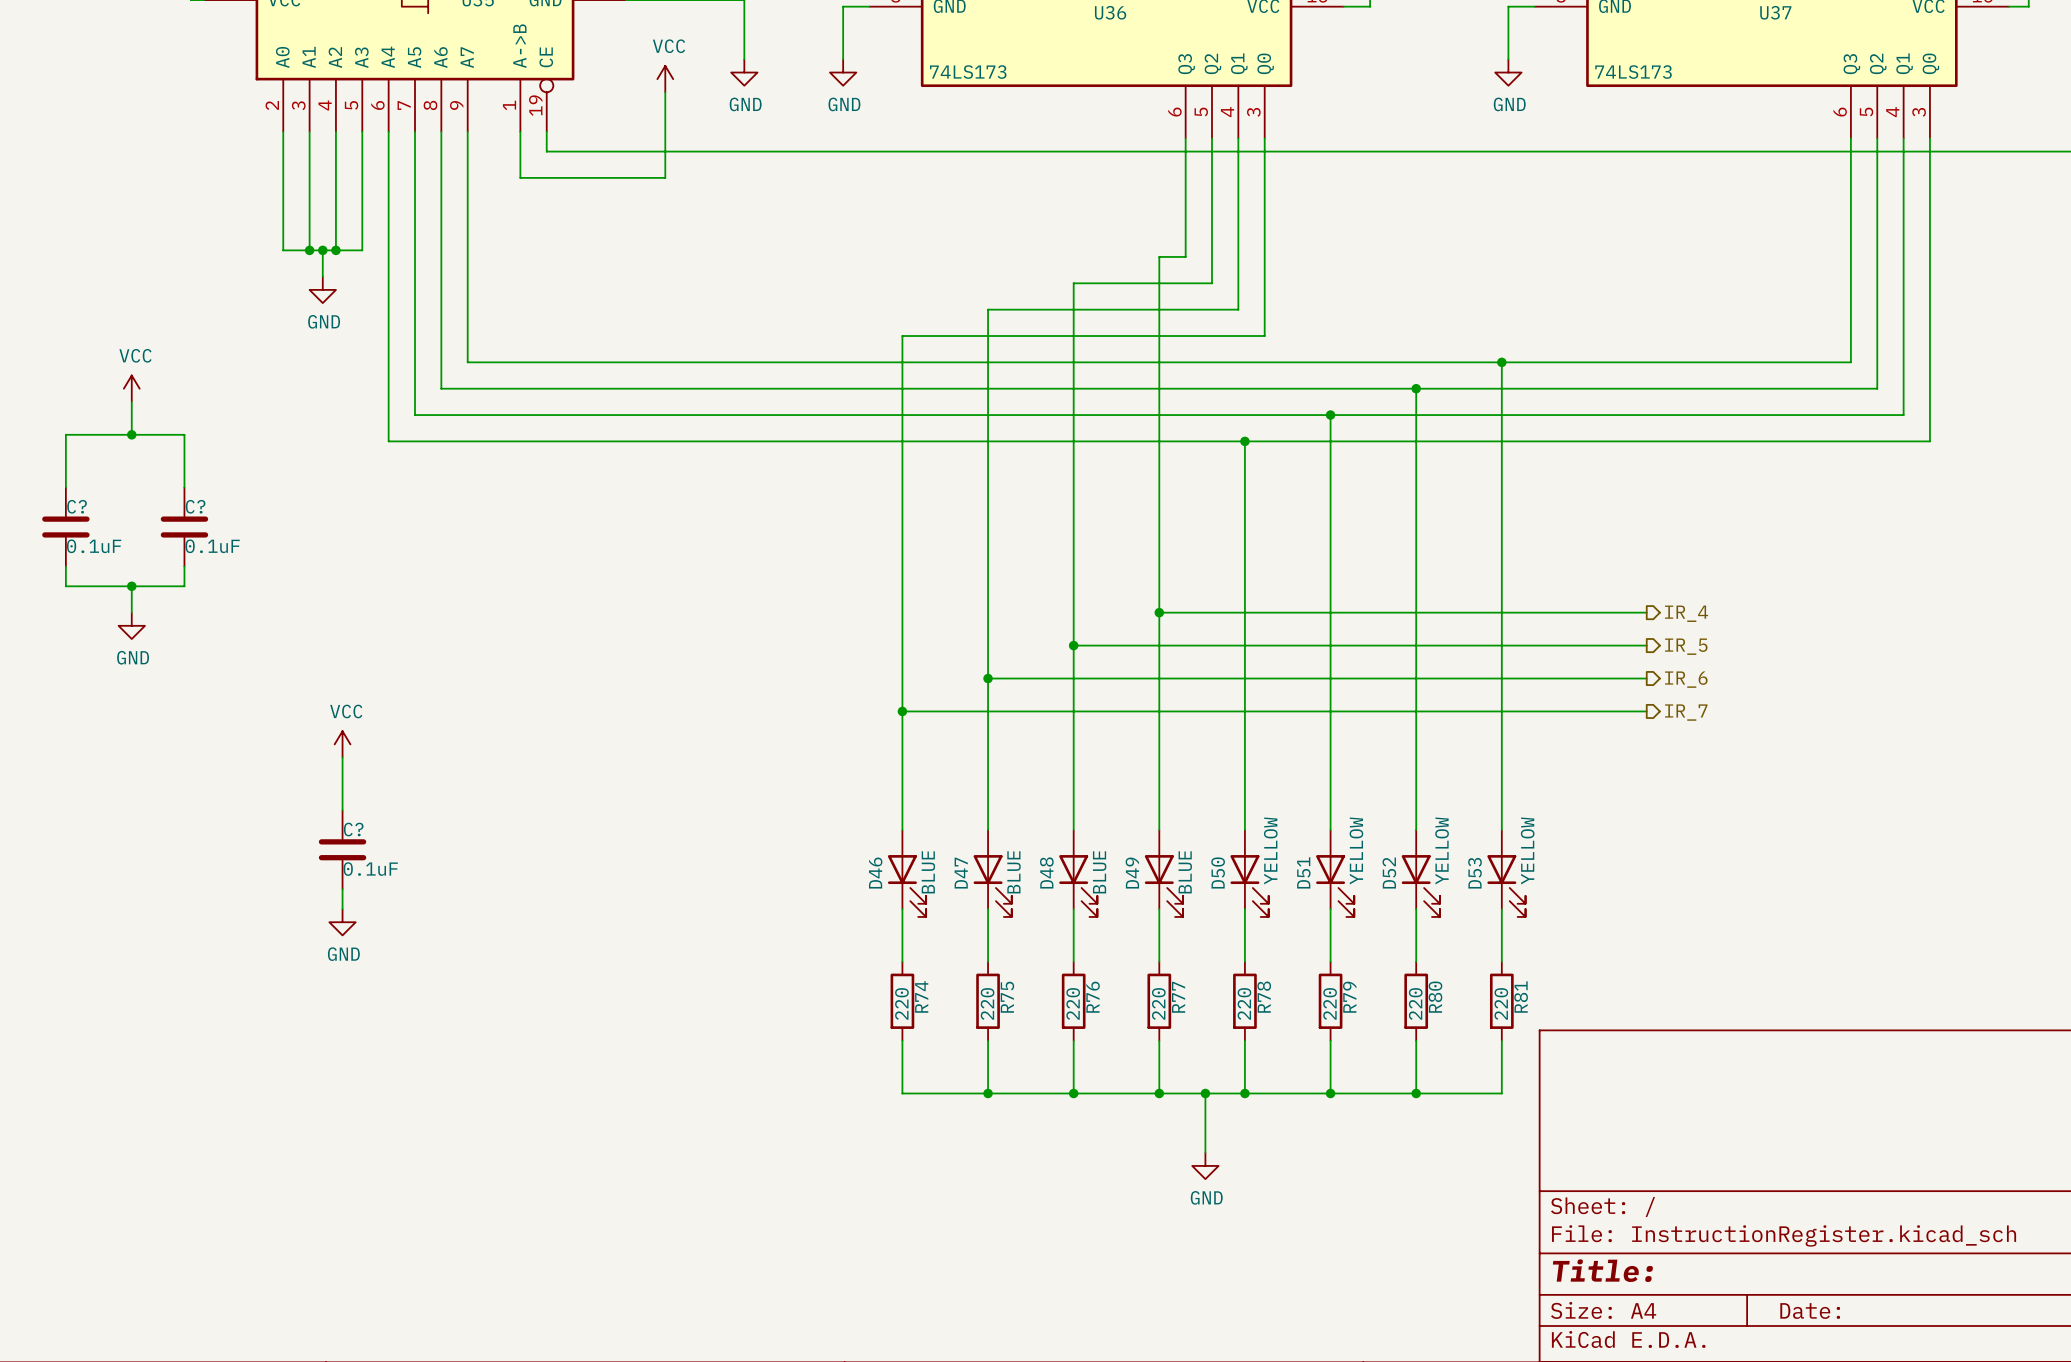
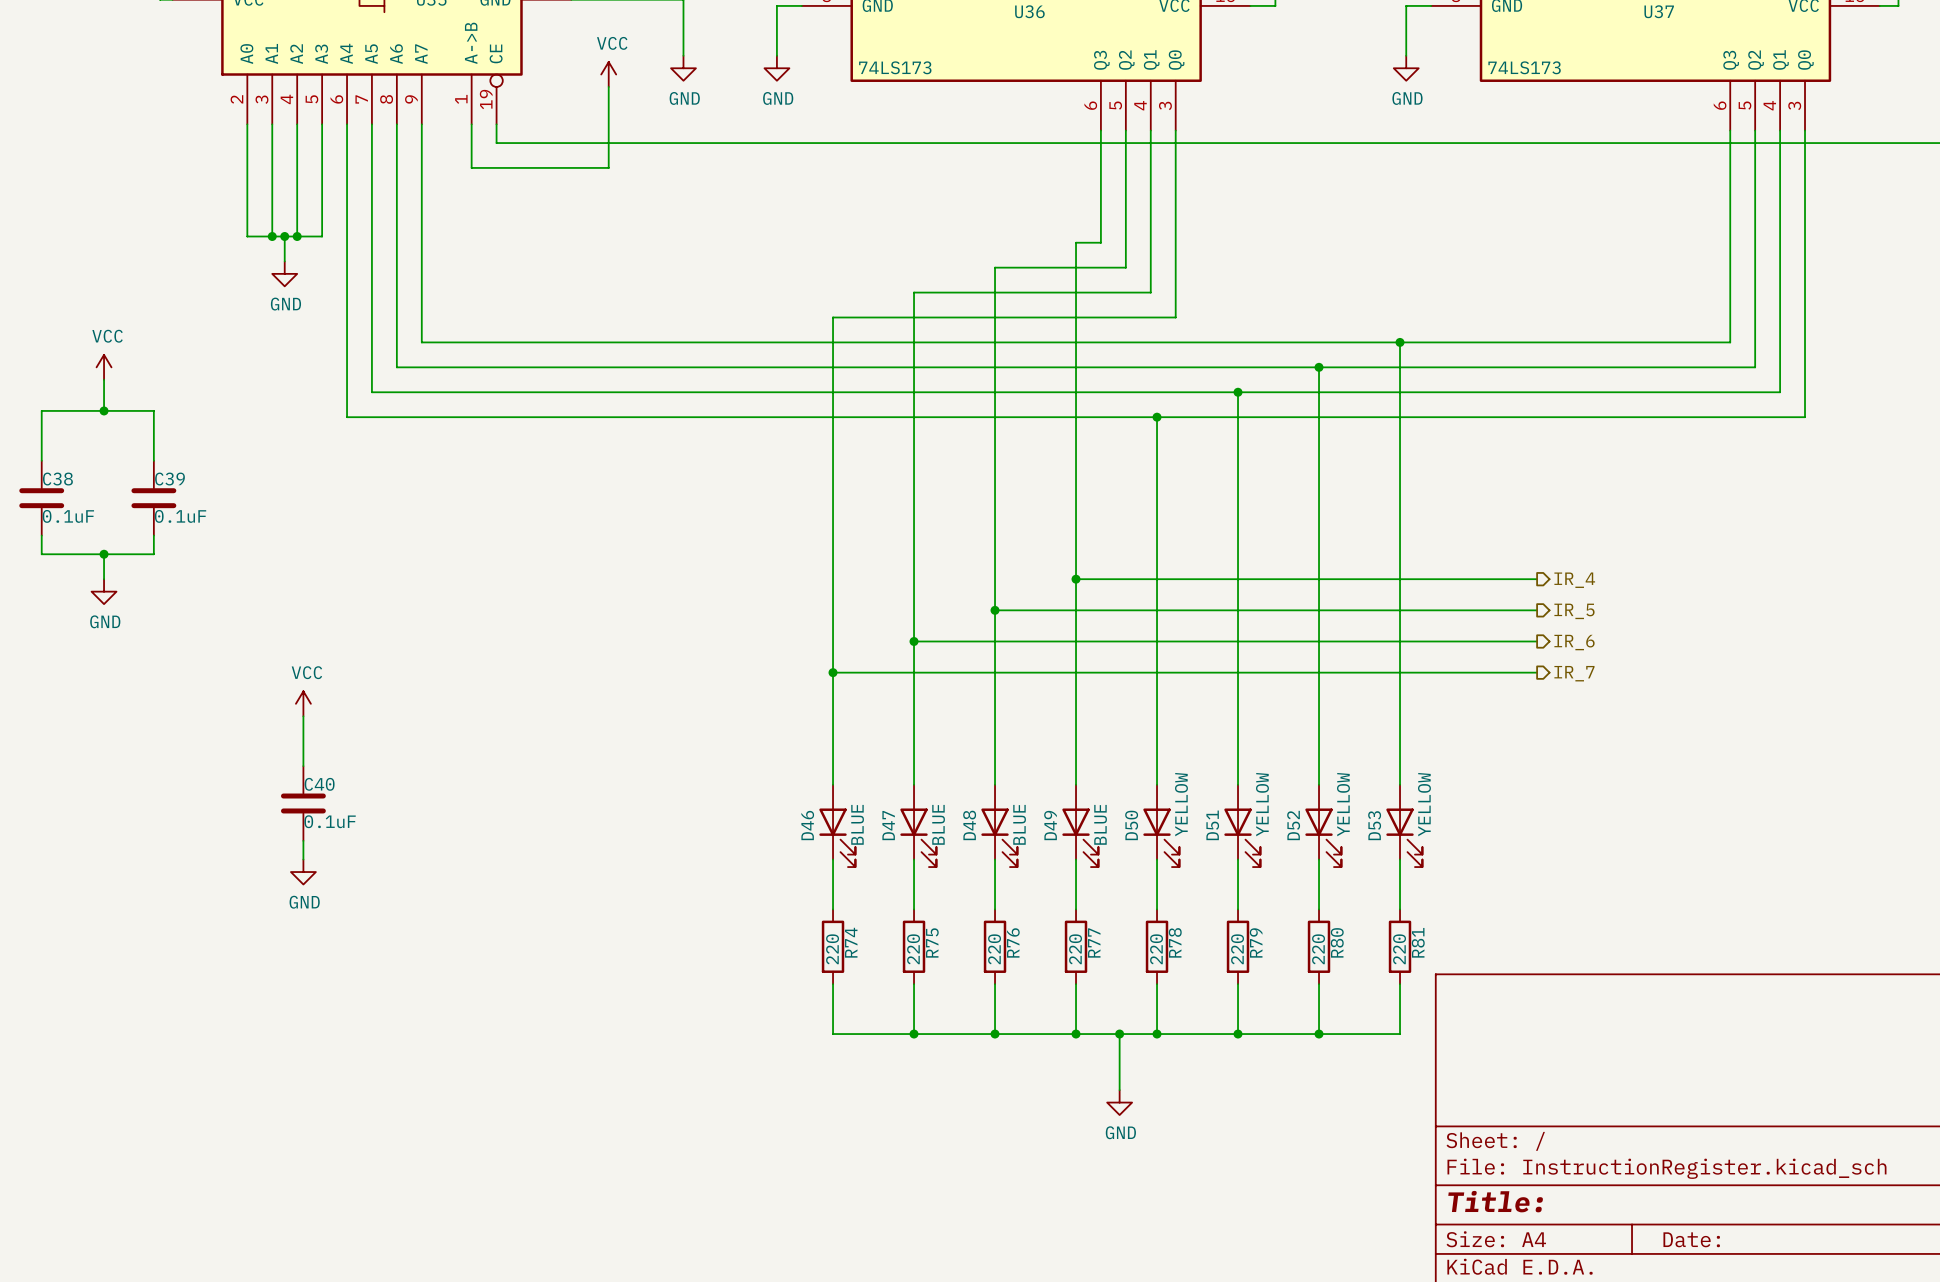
C? name: C? (77, 506) -> C38 (57, 479)
C? name: C? (195, 506) -> C39 (170, 479)
C? name: C? (353, 829) -> C40 (319, 784)

